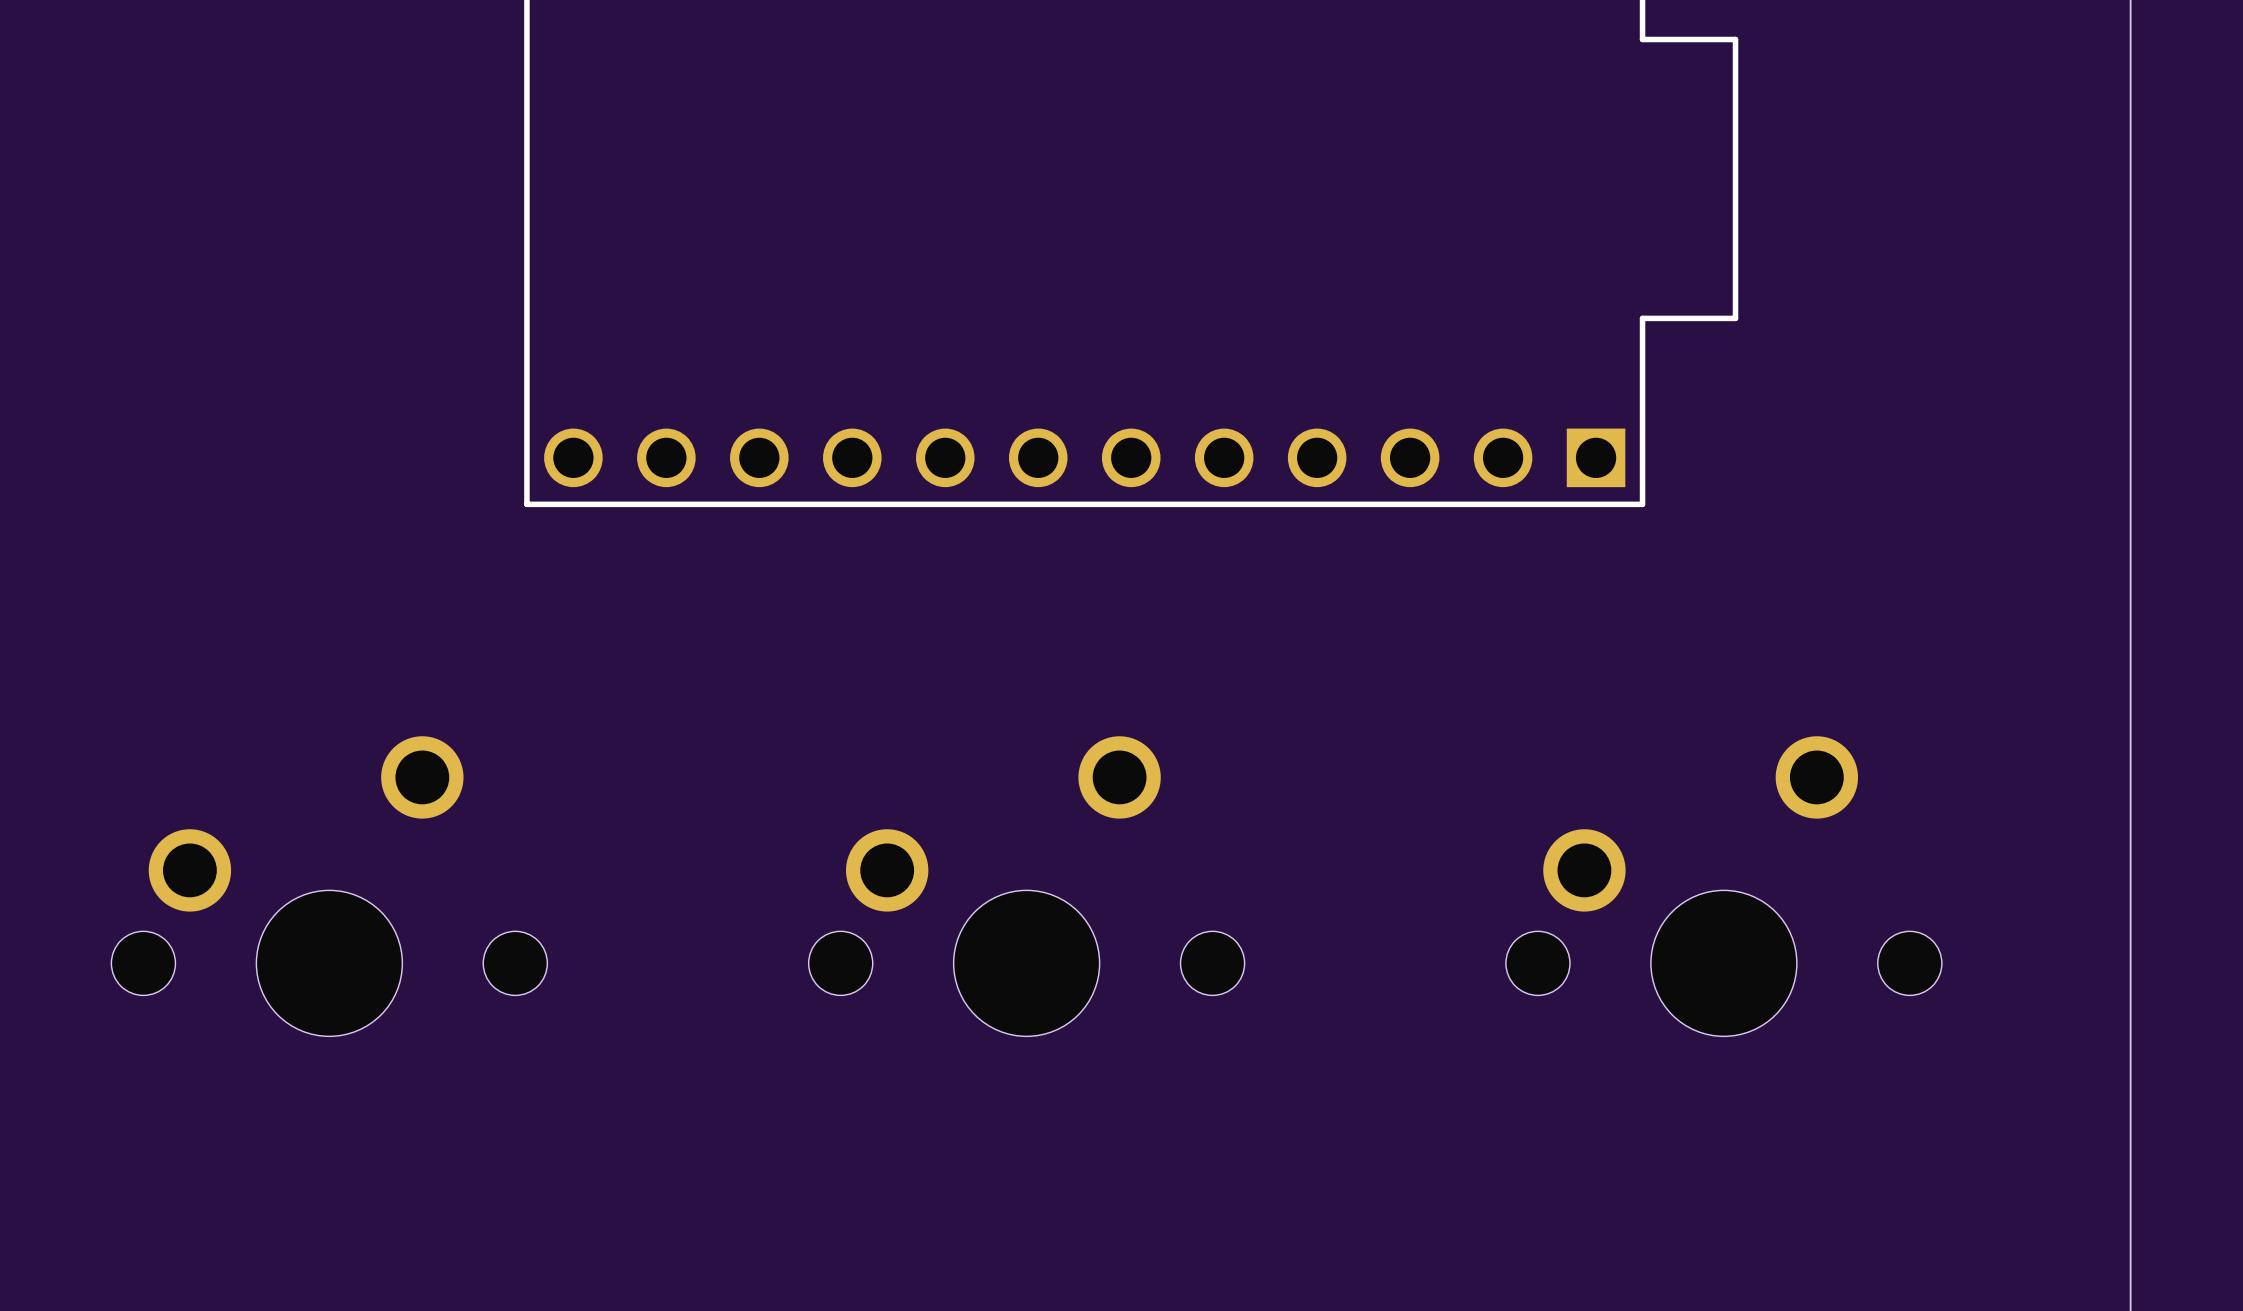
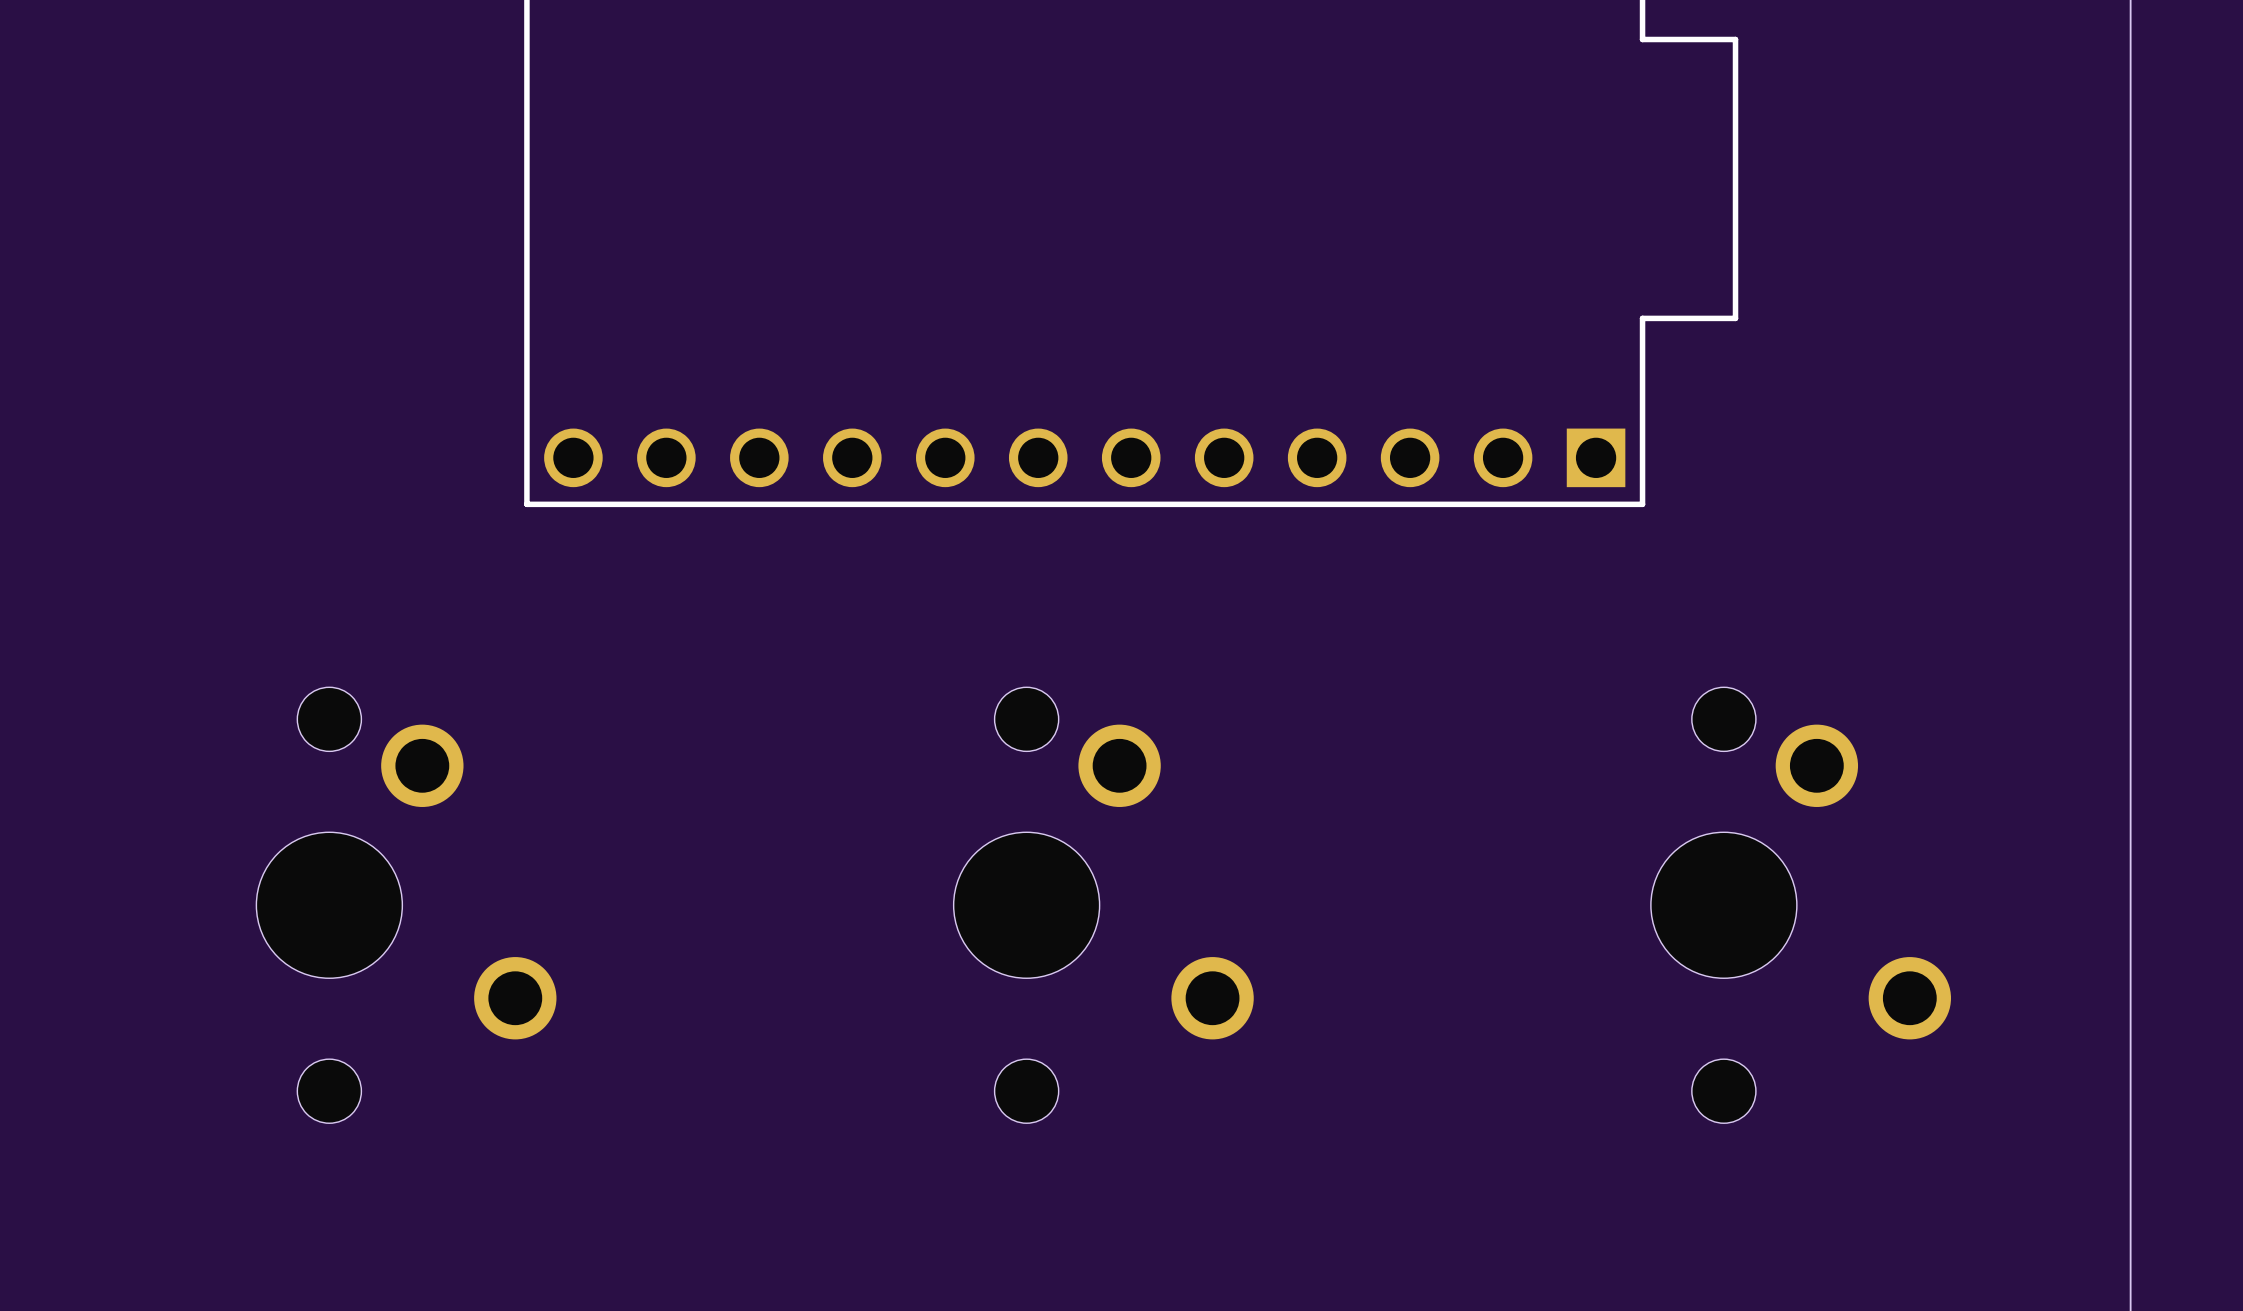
part rotation: 0° (329, 886) -> 90° clockwise (406, 905)
part rotation: 0° (1026, 886) -> 90° clockwise (1103, 905)
part rotation: 0° (1723, 886) -> 90° clockwise (1800, 905)

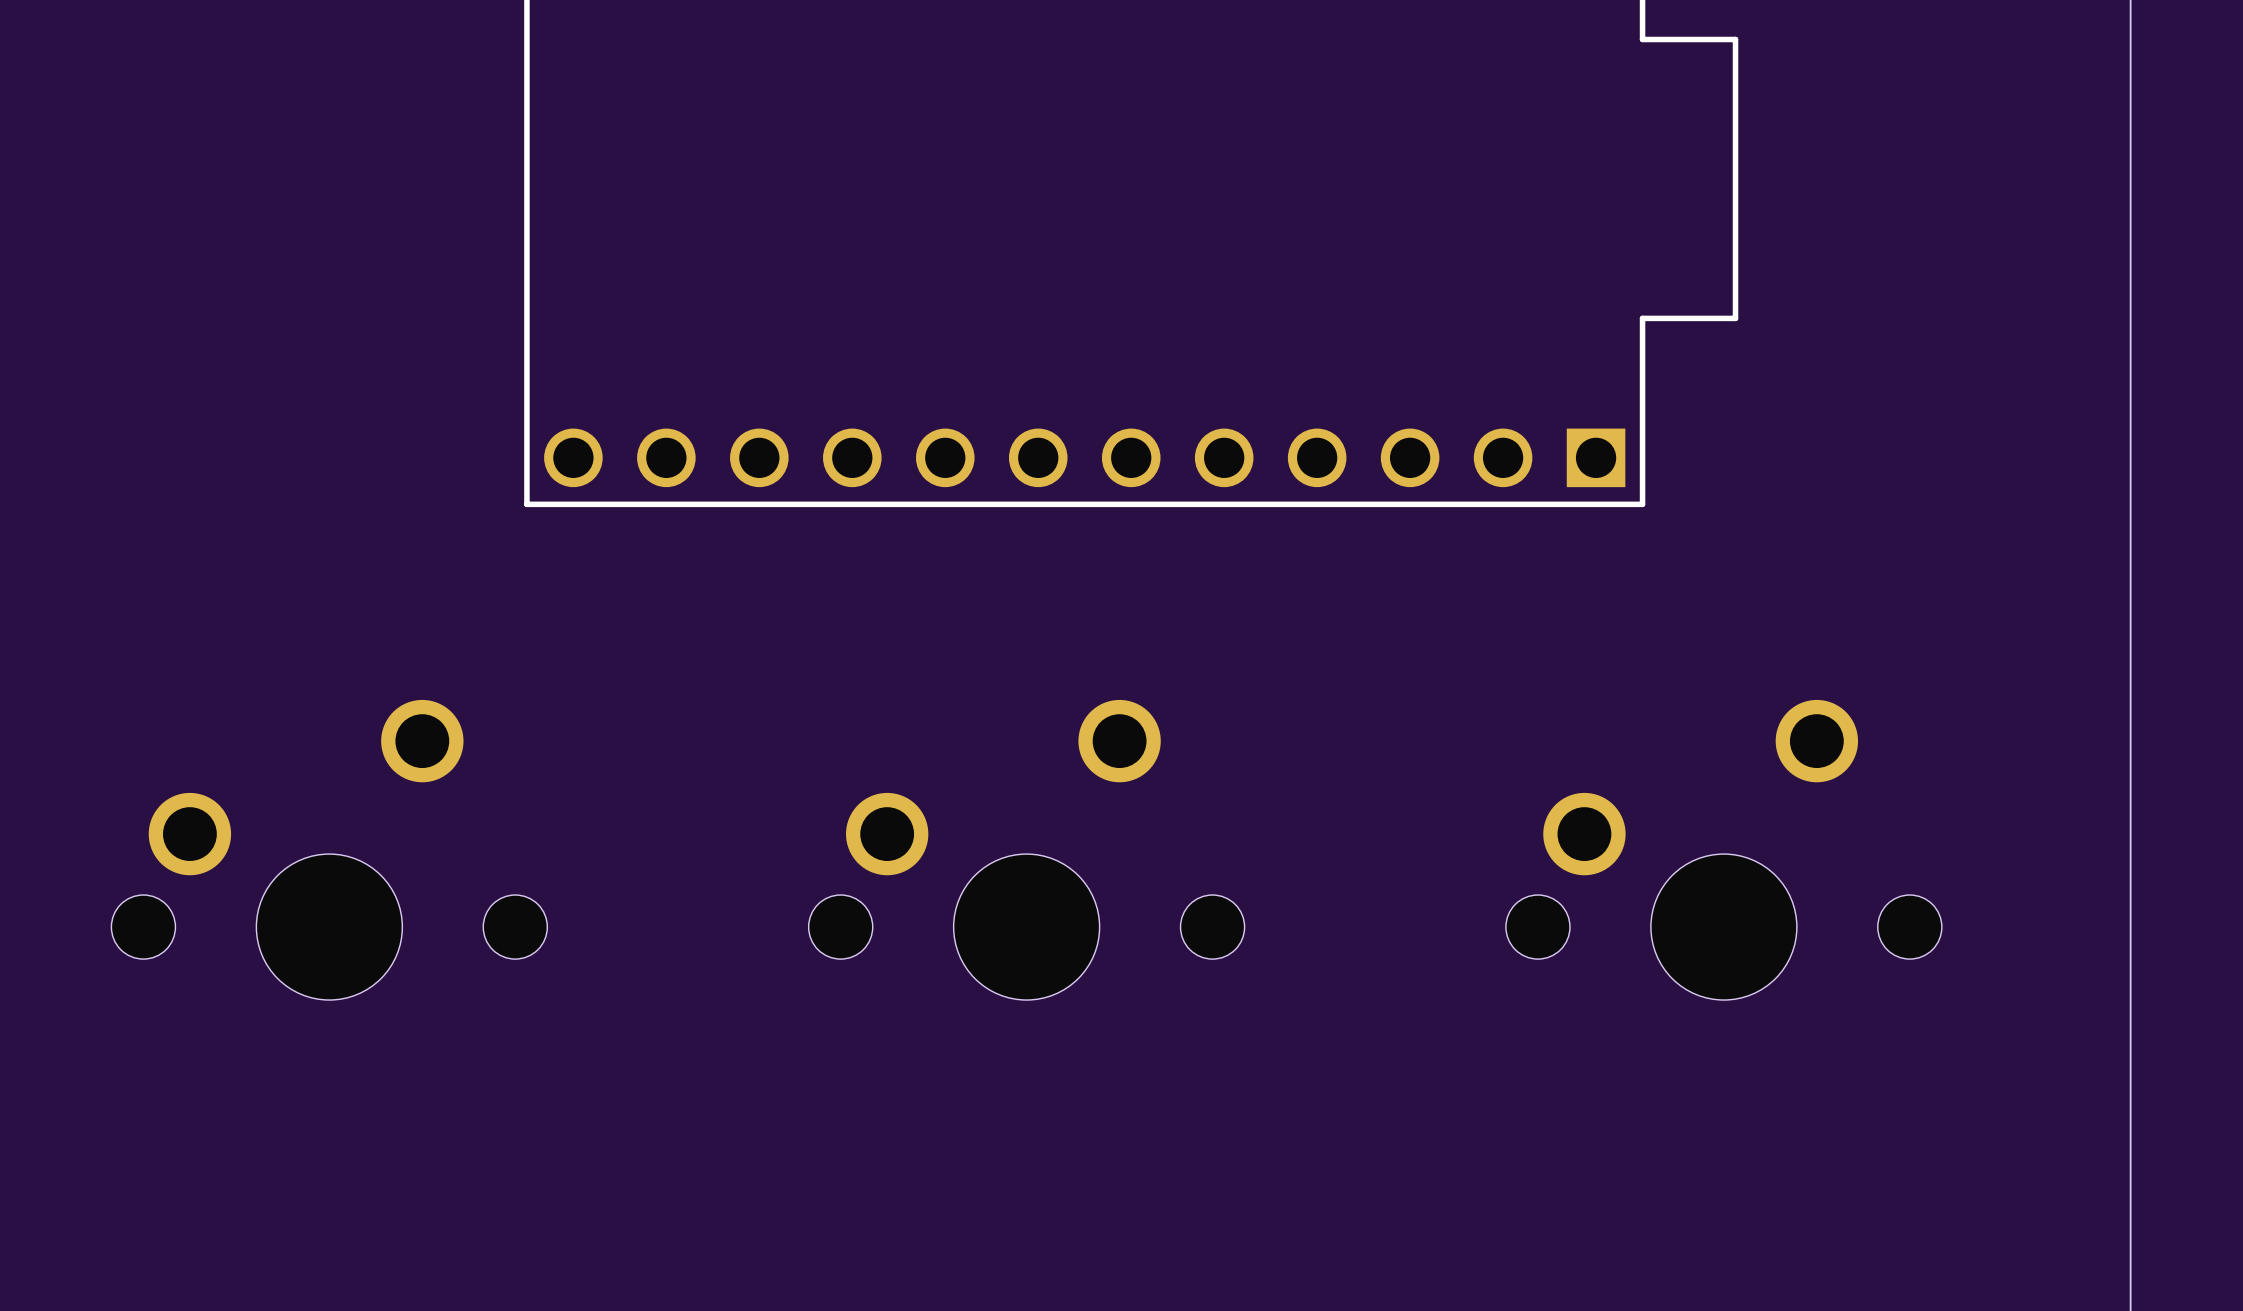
part rotation: 0° (406, 905) -> 90° counterclockwise (329, 849)
part rotation: 0° (1103, 905) -> 90° counterclockwise (1026, 849)
part rotation: 0° (1800, 905) -> 90° counterclockwise (1723, 849)

